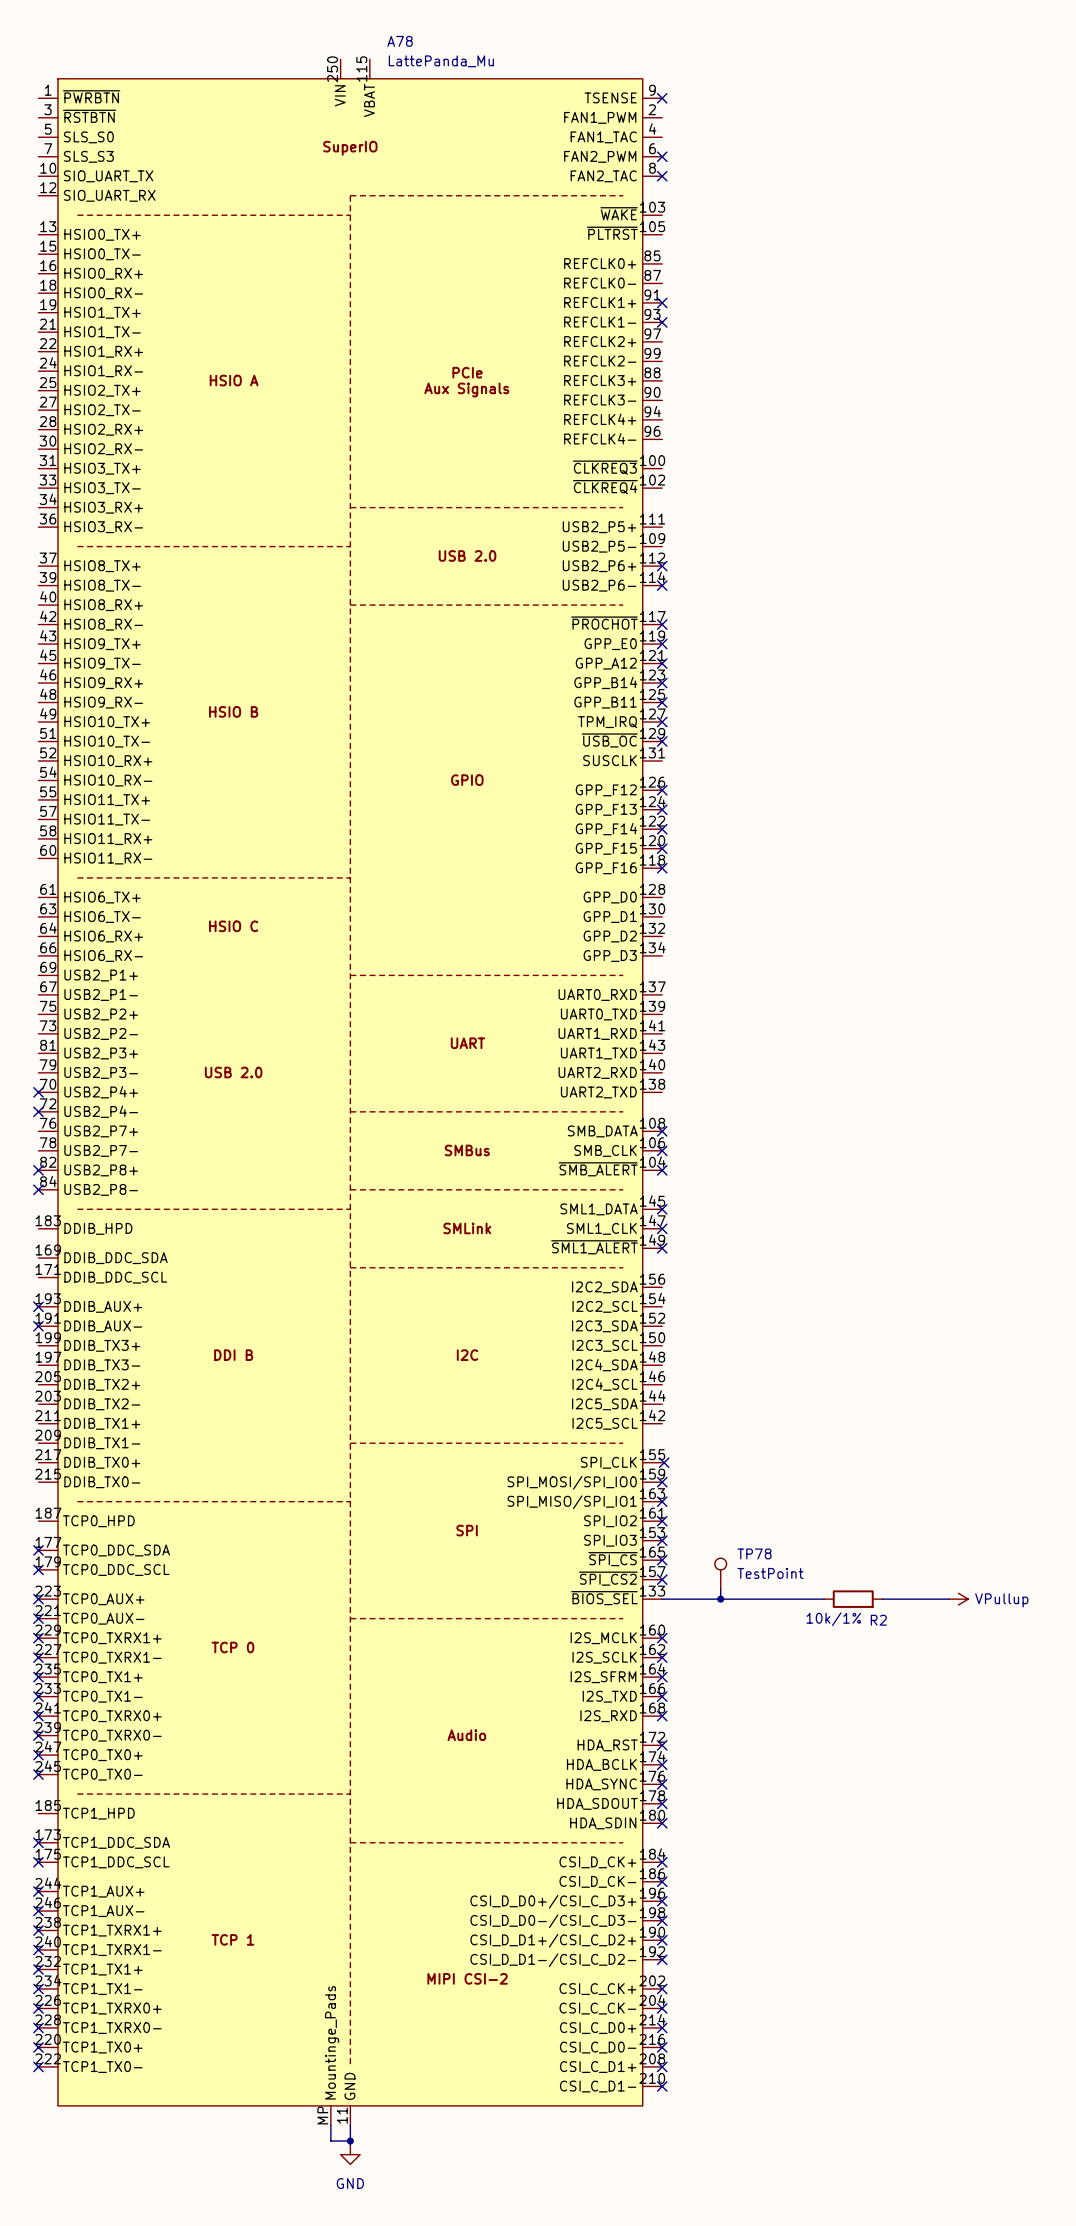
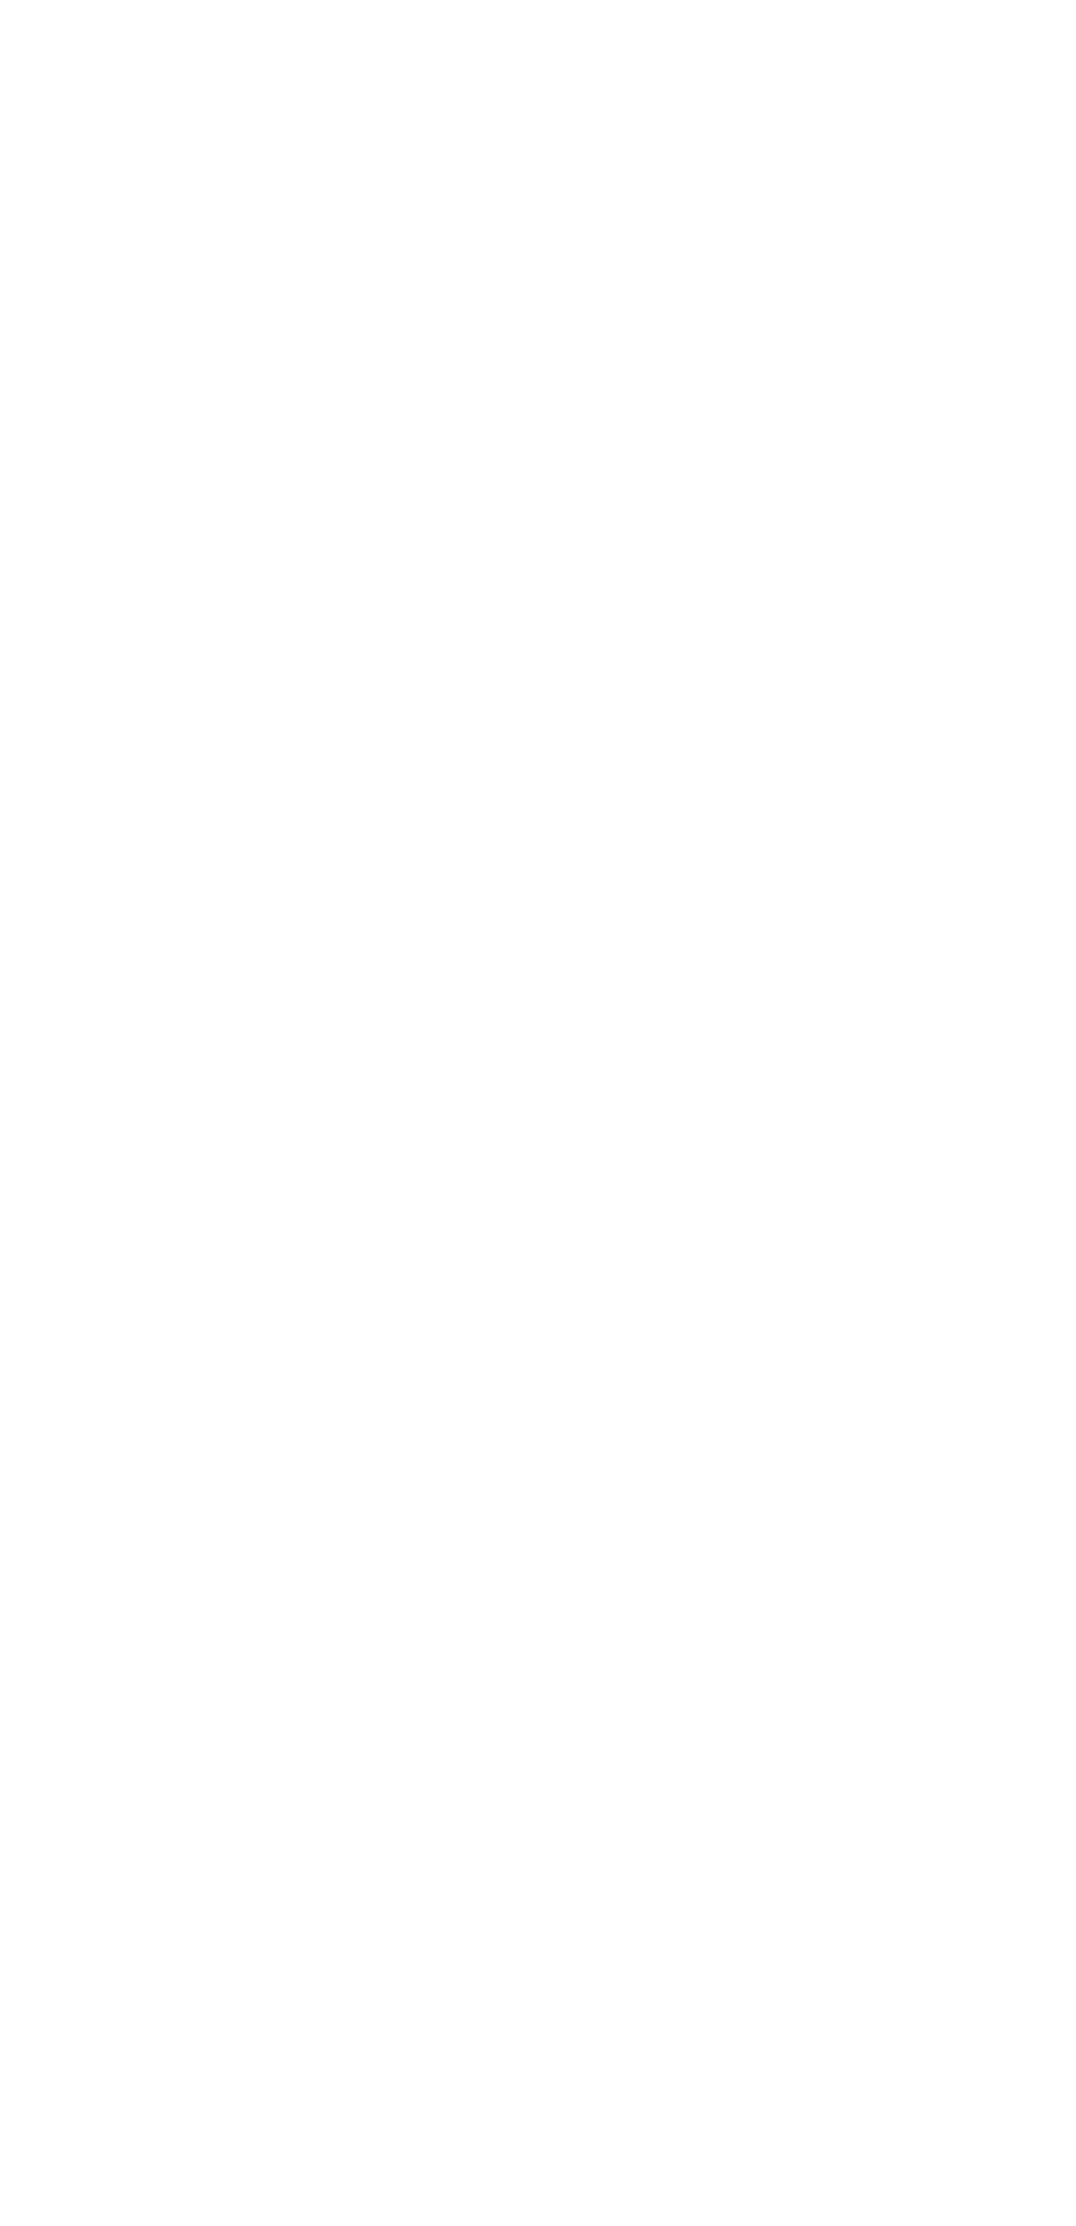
no-connect mark: (662, 98) -> none
no-connect mark: (662, 156) -> none
no-connect mark: (662, 176) -> none
no-connect mark: (662, 302) -> none
no-connect mark: (662, 322) -> none
no-connect mark: (662, 566) -> none
no-connect mark: (662, 585) -> none
no-connect mark: (662, 624) -> none
no-connect mark: (662, 644) -> none
no-connect mark: (662, 663) -> none
no-connect mark: (662, 683) -> none
no-connect mark: (662, 702) -> none
no-connect mark: (662, 722) -> none
no-connect mark: (662, 741) -> none
no-connect mark: (662, 790) -> none
no-connect mark: (662, 809) -> none
no-connect mark: (662, 829) -> none
no-connect mark: (662, 848) -> none
no-connect mark: (662, 868) -> none
no-connect mark: (38, 1092) -> none
A78: LattePanda_Mu (350, 1092) -> none
no-connect mark: (38, 1111) -> none
no-connect mark: (662, 1131) -> none
no-connect mark: (662, 1150) -> none
no-connect mark: (38, 1170) -> none
no-connect mark: (662, 1170) -> none
no-connect mark: (38, 1189) -> none
no-connect mark: (662, 1209) -> none
no-connect mark: (662, 1228) -> none
no-connect mark: (662, 1248) -> none
no-connect mark: (38, 1306) -> none
no-connect mark: (38, 1326) -> none
no-connect mark: (664, 1462) -> none
no-connect mark: (662, 1482) -> none
no-connect mark: (662, 1501) -> none
no-connect mark: (662, 1521) -> none
no-connect mark: (662, 1540) -> none
no-connect mark: (38, 1550) -> none
no-connect mark: (662, 1560) -> none
no-connect mark: (38, 1569) -> none
TP78: TestPoint (720, 1573) -> none
no-connect mark: (662, 1579) -> none
wire: (720, 1589) (720, 1599) -> none
no-connect mark: (38, 1599) -> none
wire: (662, 1599) (824, 1599) -> none
junction: (720, 1599) -> none
R2: 10k/1% (853, 1599) -> none
wire: (882, 1599) (948, 1599) -> none
power symbol: VPullup (958, 1599) -> none
no-connect mark: (38, 1618) -> none
no-connect mark: (38, 1638) -> none
no-connect mark: (662, 1638) -> none
no-connect mark: (38, 1657) -> none
no-connect mark: (662, 1657) -> none
no-connect mark: (38, 1677) -> none
no-connect mark: (662, 1677) -> none
no-connect mark: (38, 1696) -> none
no-connect mark: (662, 1696) -> none
no-connect mark: (38, 1716) -> none
no-connect mark: (662, 1716) -> none
no-connect mark: (38, 1735) -> none
no-connect mark: (662, 1745) -> none
no-connect mark: (38, 1755) -> none
no-connect mark: (662, 1764) -> none
no-connect mark: (38, 1774) -> none
no-connect mark: (662, 1784) -> none
no-connect mark: (662, 1803) -> none
no-connect mark: (662, 1823) -> none
no-connect mark: (38, 1842) -> none
no-connect mark: (38, 1862) -> none
no-connect mark: (662, 1862) -> none
no-connect mark: (662, 1881) -> none
no-connect mark: (38, 1891) -> none
no-connect mark: (662, 1901) -> none
no-connect mark: (38, 1911) -> none
no-connect mark: (662, 1920) -> none
no-connect mark: (38, 1930) -> none
no-connect mark: (662, 1940) -> none
no-connect mark: (38, 1949) -> none
no-connect mark: (662, 1959) -> none
no-connect mark: (38, 1969) -> none
no-connect mark: (38, 1988) -> none
no-connect mark: (662, 1988) -> none
no-connect mark: (38, 2008) -> none
no-connect mark: (662, 2008) -> none
no-connect mark: (38, 2027) -> none
no-connect mark: (662, 2027) -> none
no-connect mark: (38, 2047) -> none
no-connect mark: (662, 2047) -> none
no-connect mark: (38, 2066) -> none
no-connect mark: (662, 2066) -> none
no-connect mark: (662, 2086) -> none
wire: (330, 2125) (330, 2141) (350, 2141) -> none
wire: (350, 2125) (350, 2144) -> none
junction: (350, 2141) -> none
power symbol: GND (350, 2154) -> none

